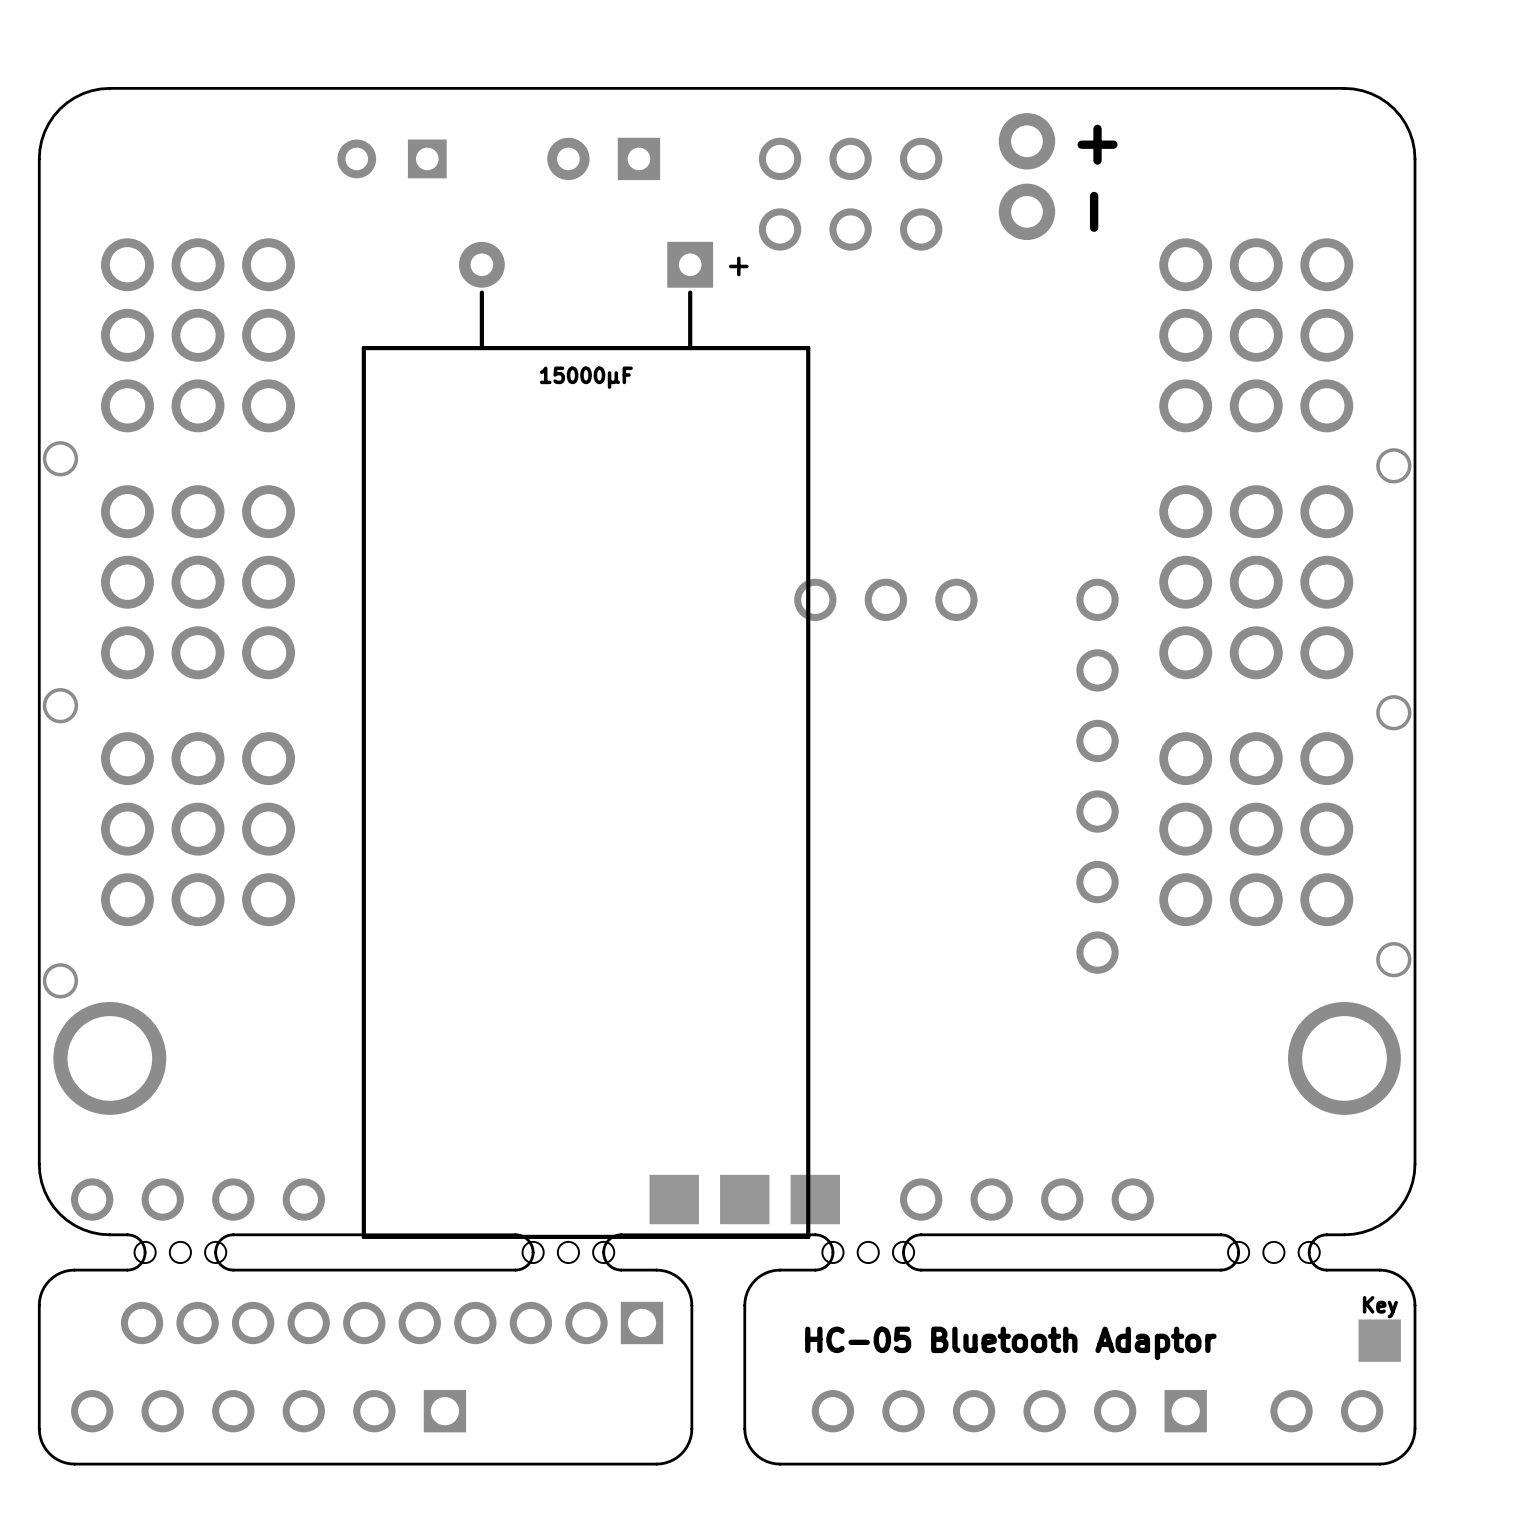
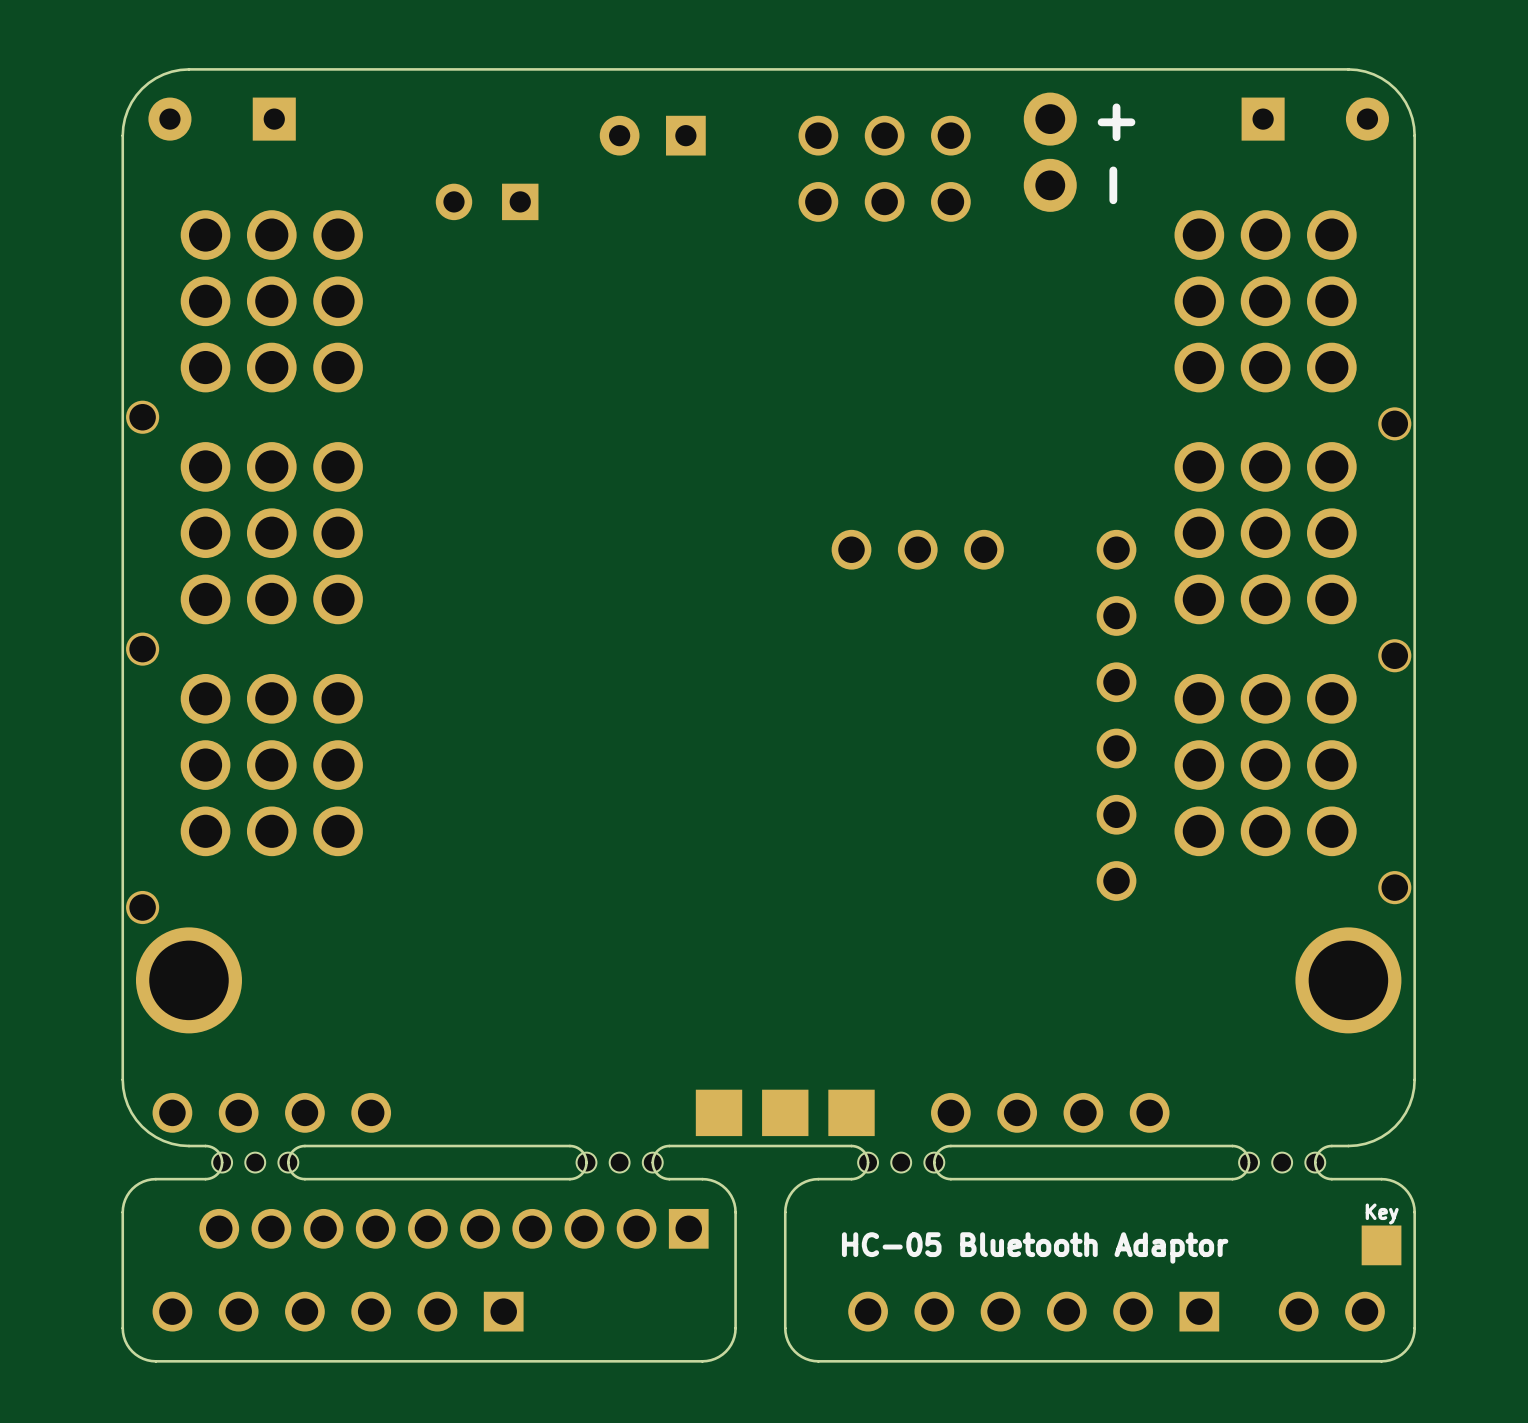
part: none -> (222, 119)
part: none -> (1315, 119)
part position: (392, 158) -> (487, 201)
part: 15000µF (586, 740) -> none

